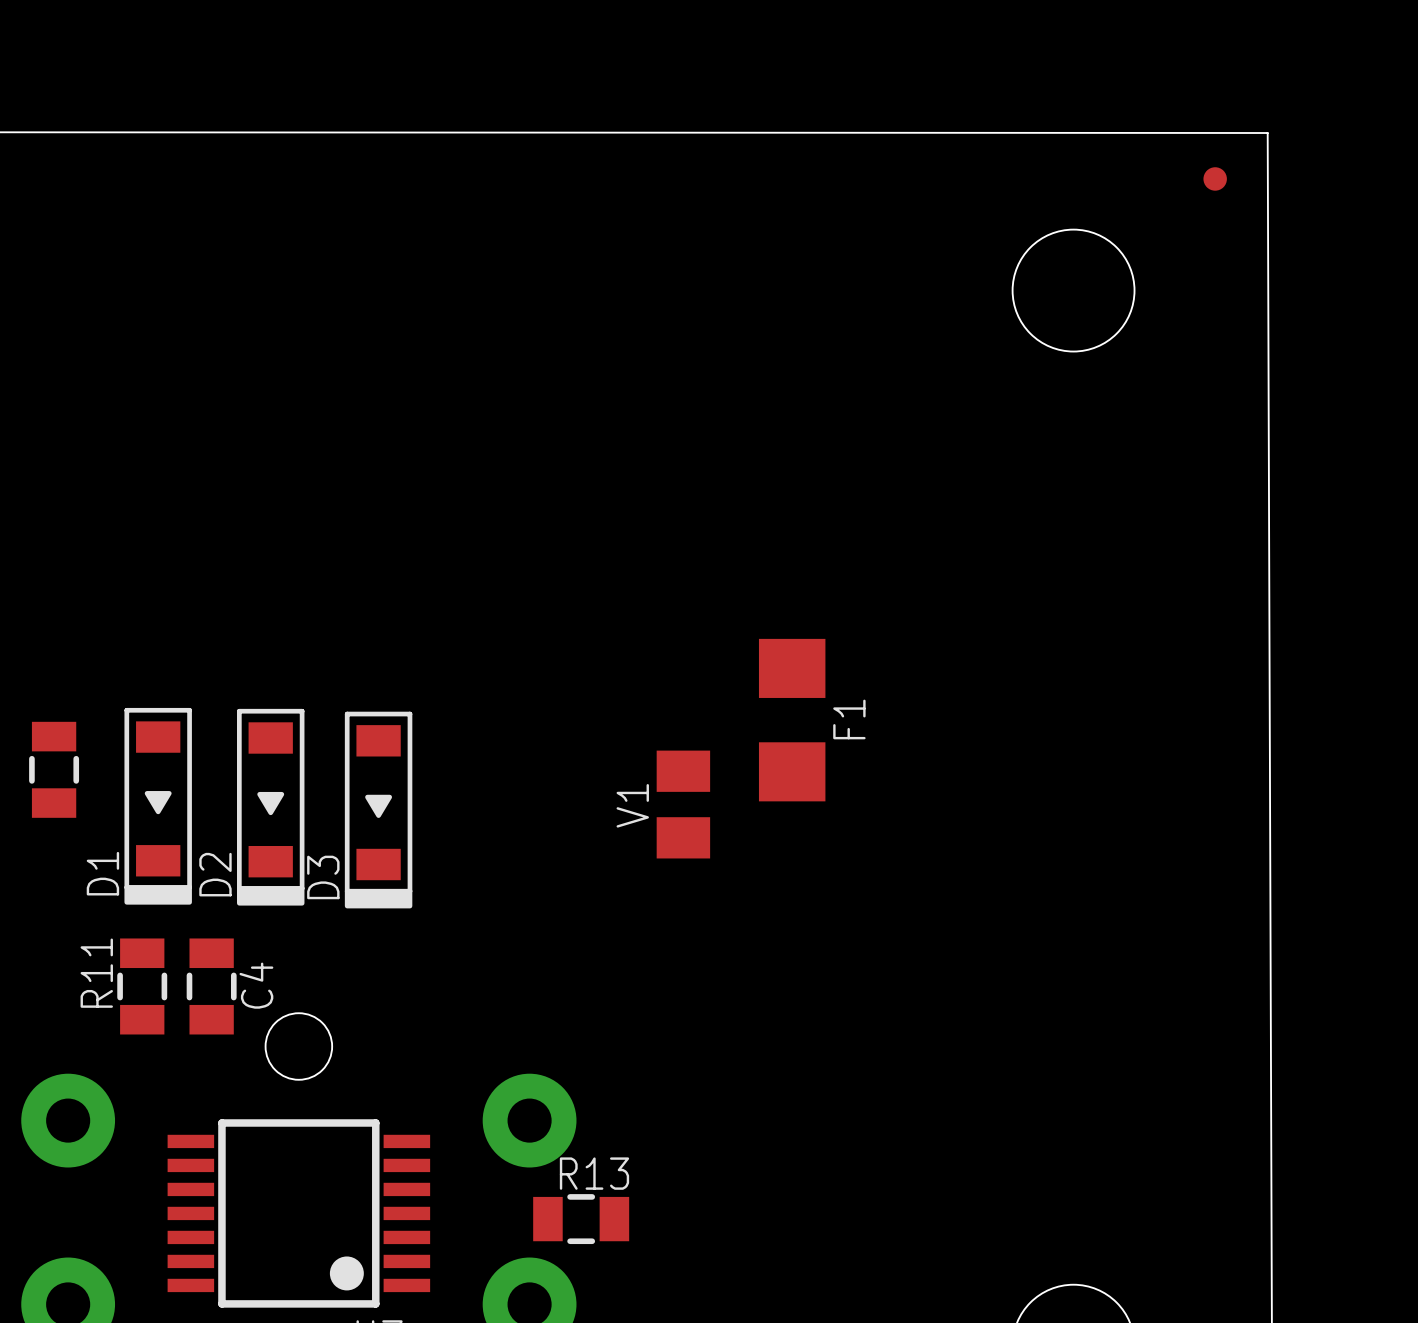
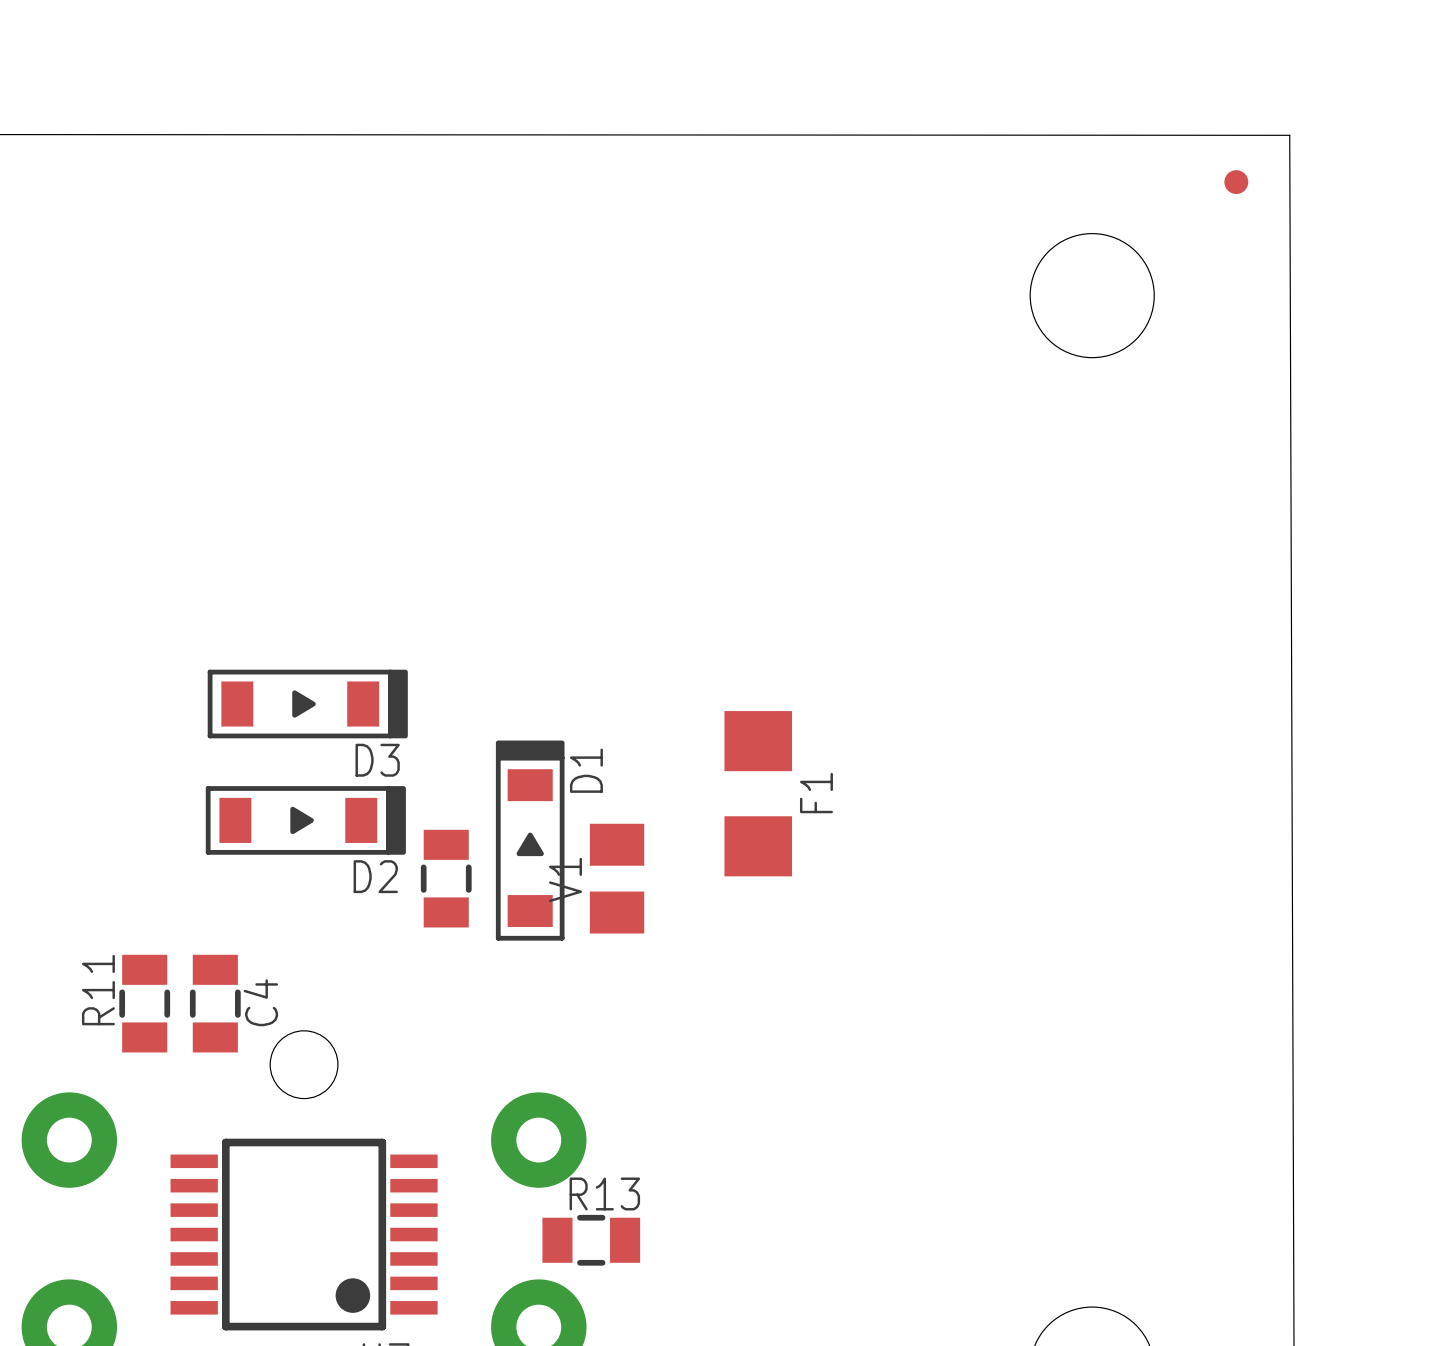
F1 position: (792, 720) -> (758, 793)
part position: (54, 769) -> (446, 878)
V1 position: (683, 804) -> (617, 878)
D1 rotation: 0° (158, 806) -> 180° (530, 840)
D1 position: (158, 806) -> (530, 840)
D2 rotation: 0° (270, 807) -> 90° counterclockwise (305, 820)
D3 rotation: 0° (378, 810) -> 90° counterclockwise (307, 704)
D3 position: (378, 810) -> (307, 704)

